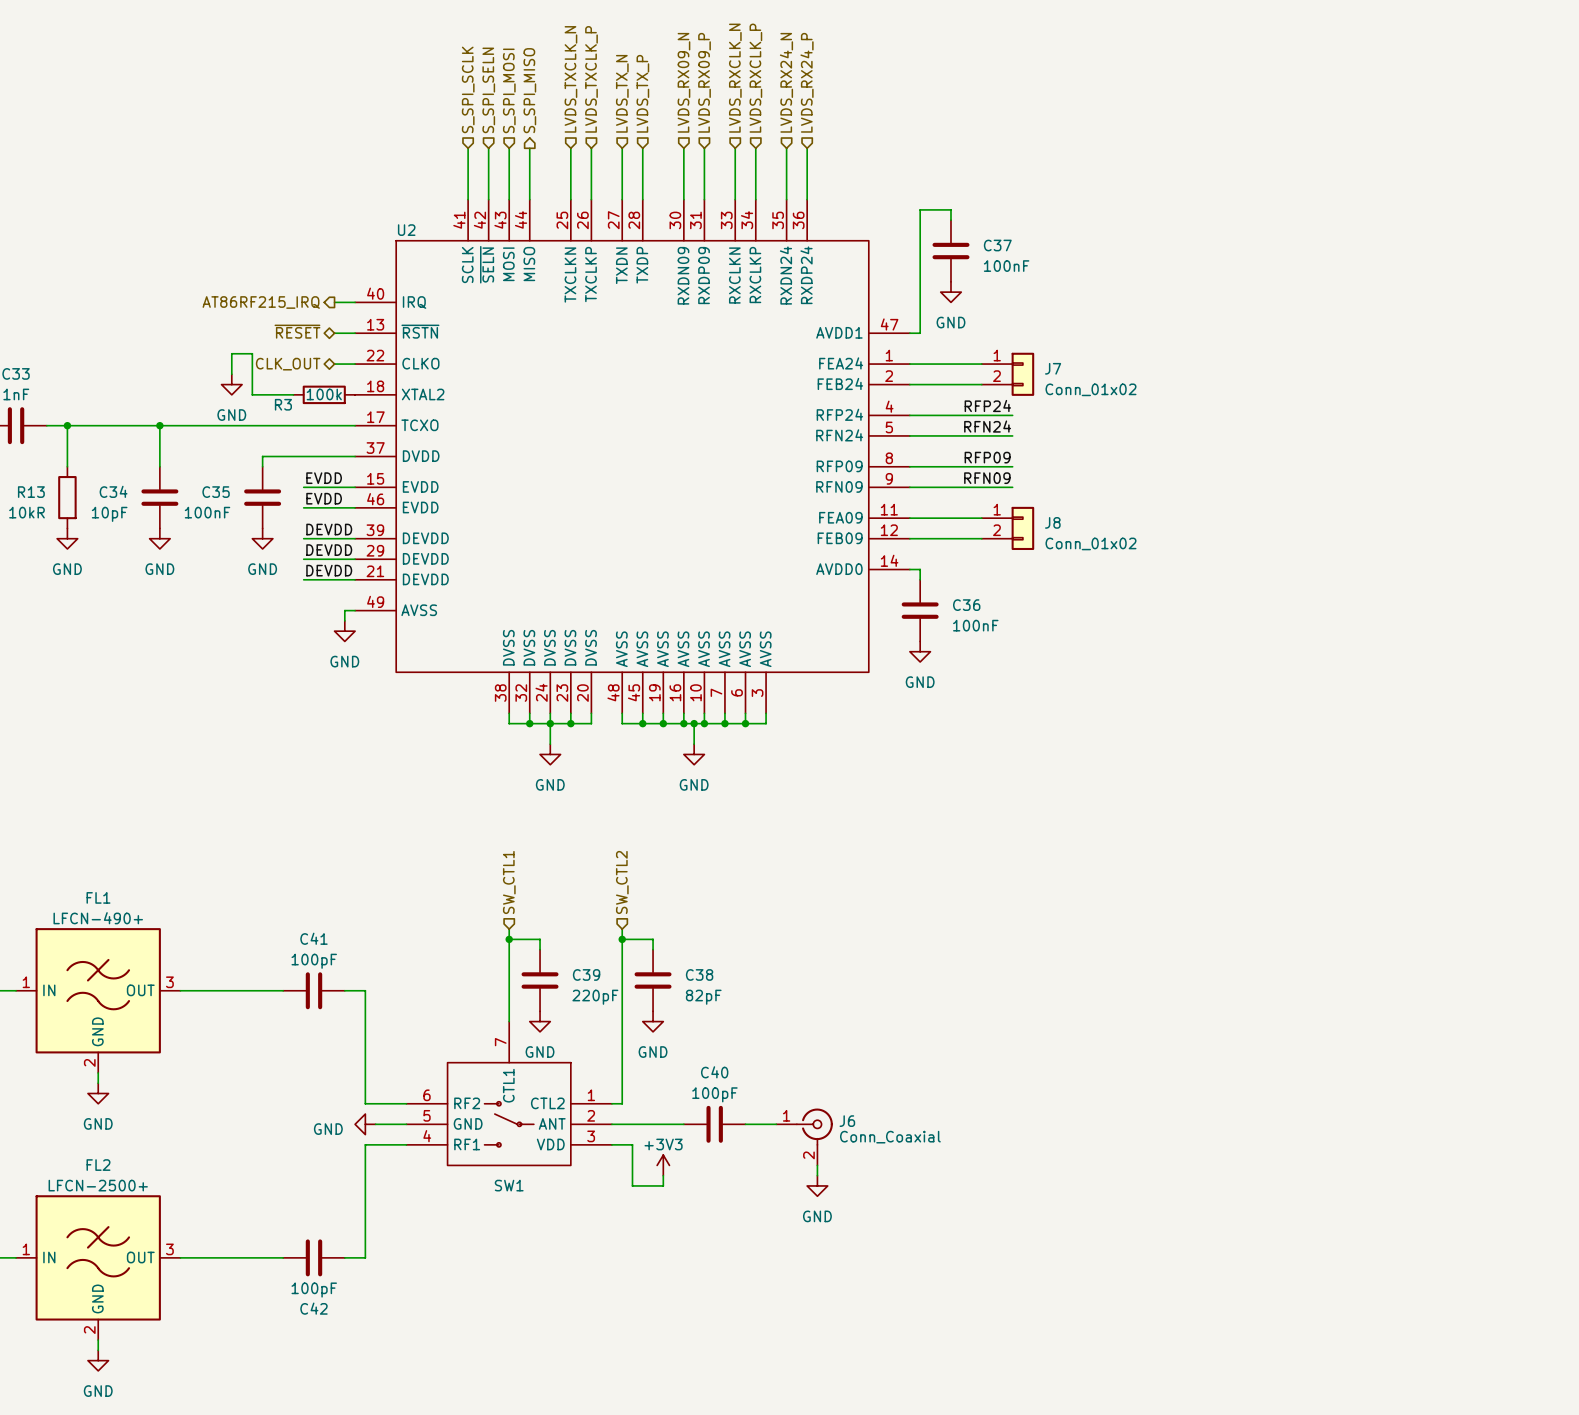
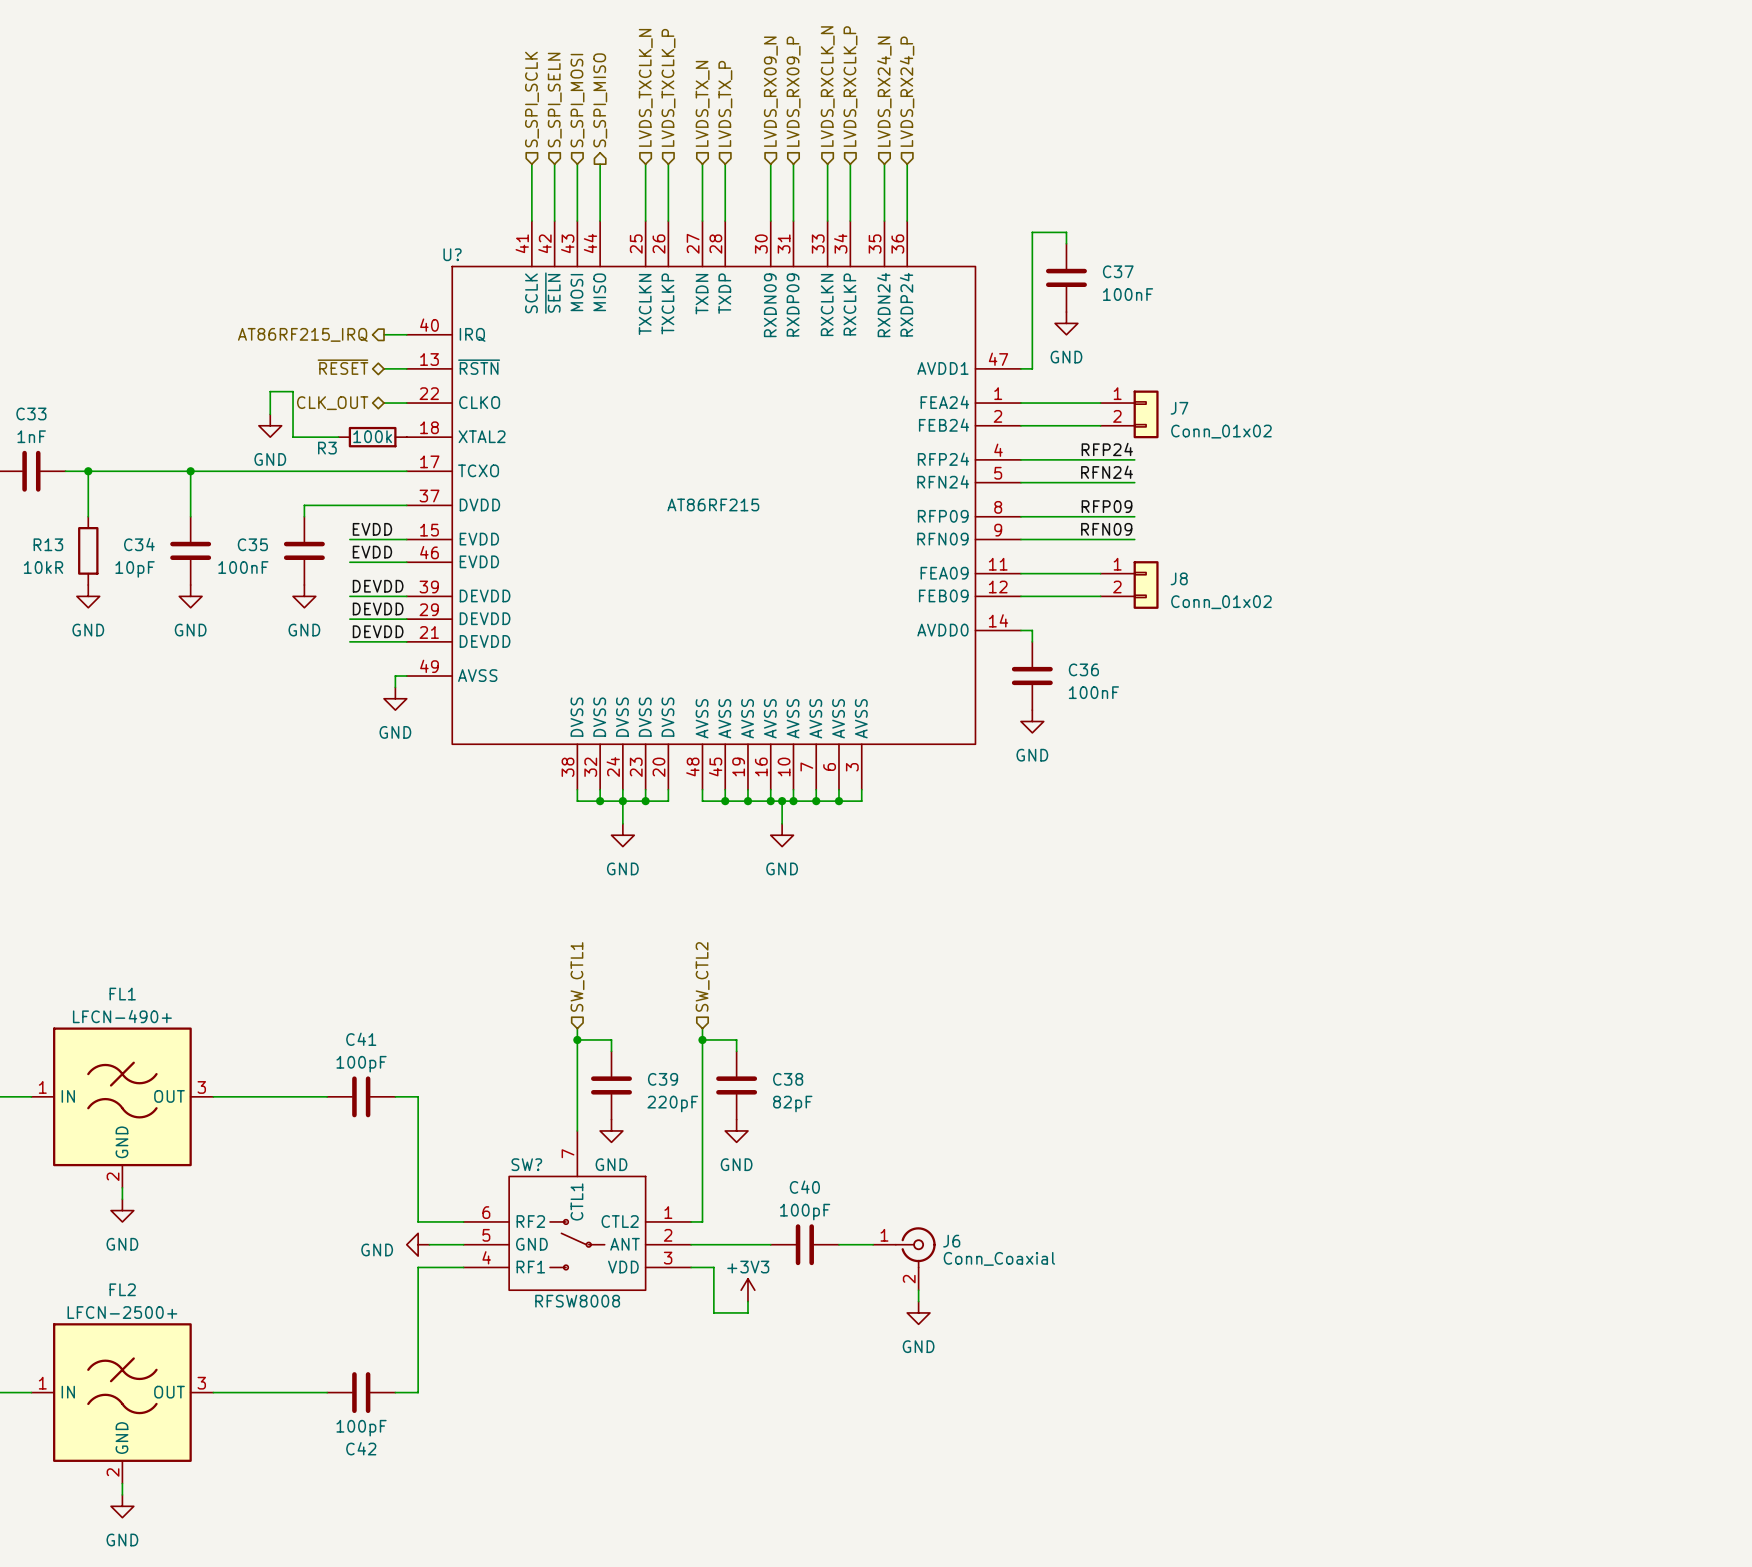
U2 name: U2 (406, 230) -> U? (452, 254)
U2 value: none -> AT86RF215 (713, 504)
SW1 value: none -> RFSW8008 (577, 1301)
SW1 name: SW1 (509, 1185) -> SW? (526, 1164)

